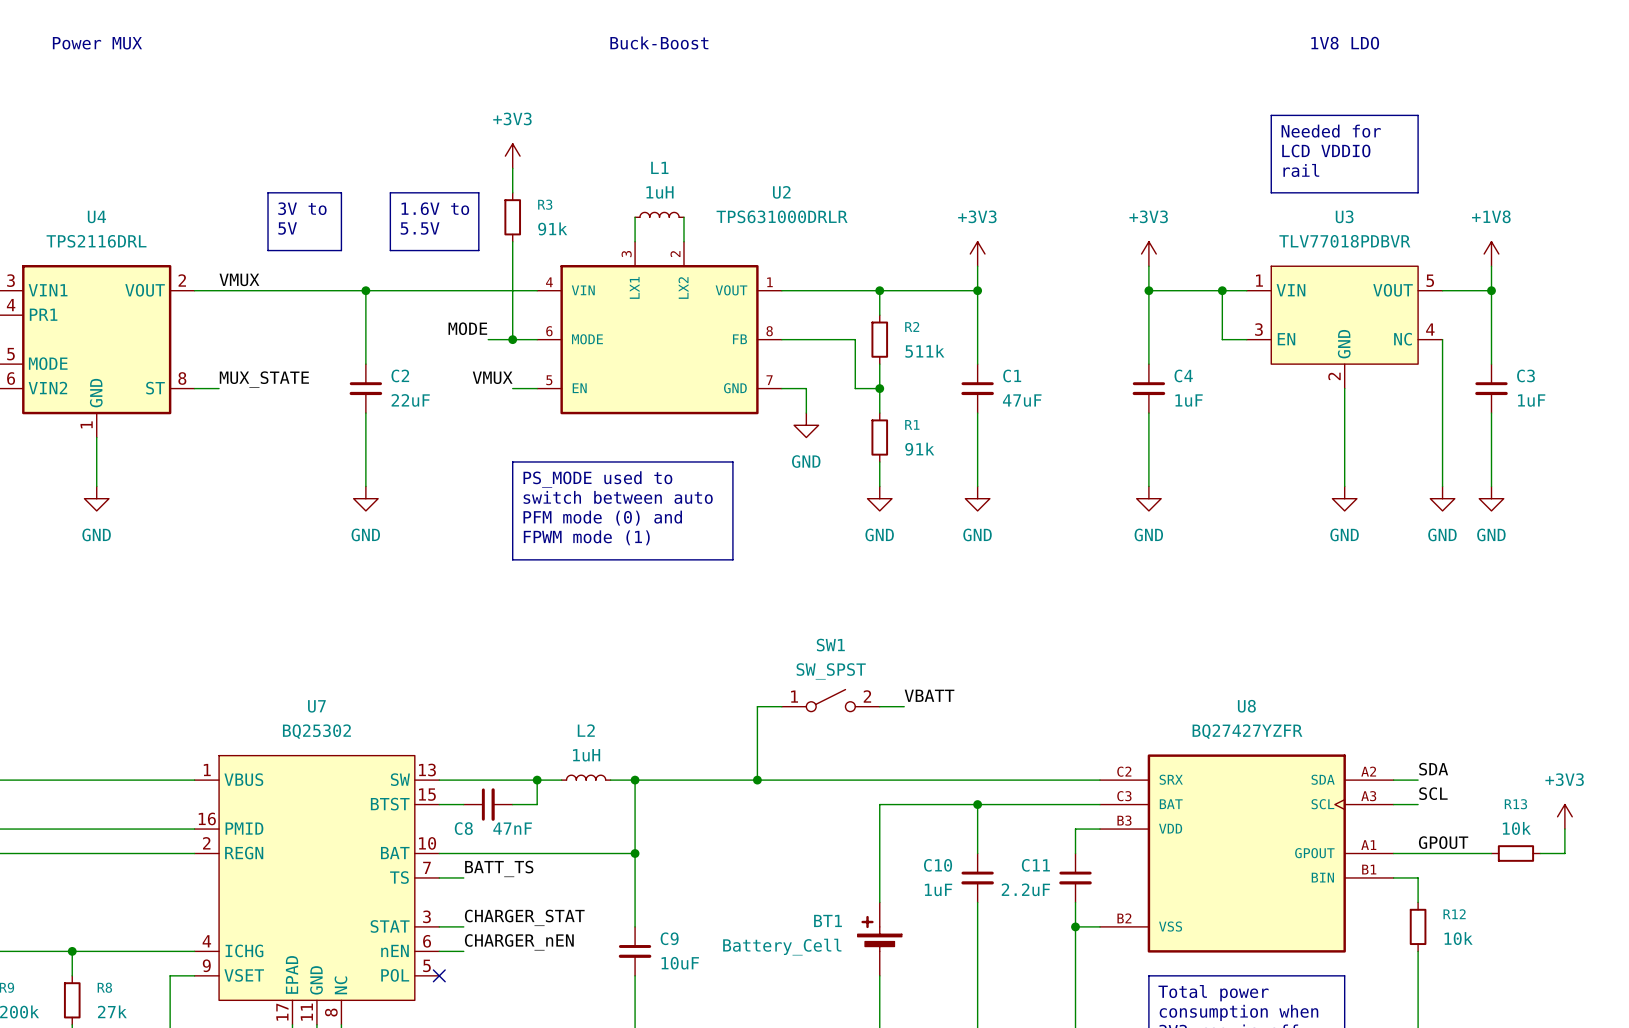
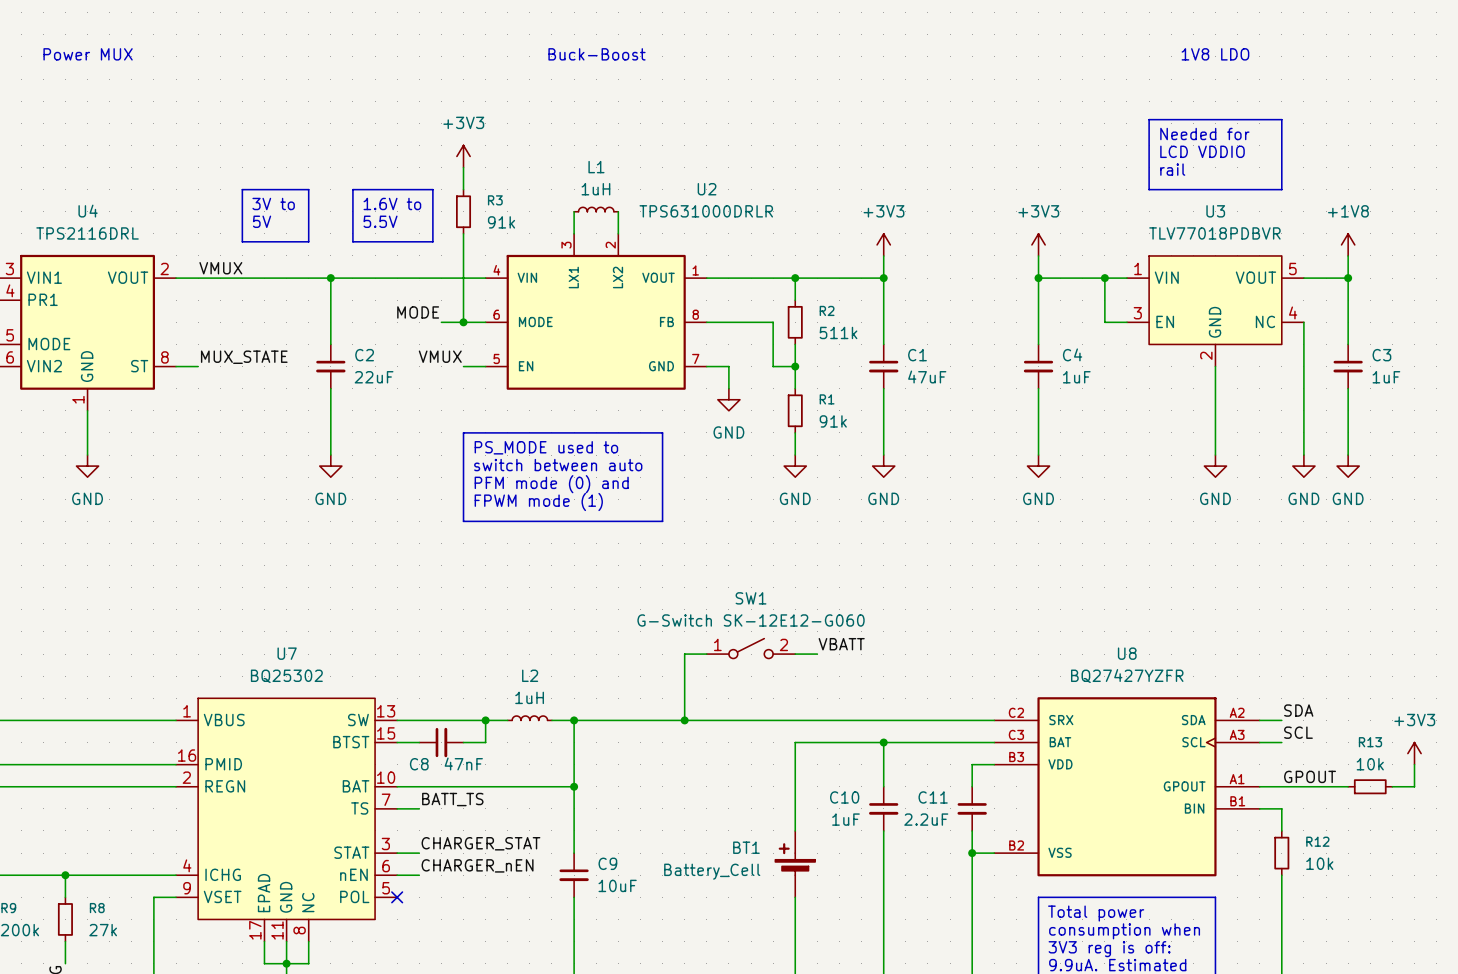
SW1 value: SW_SPST (831, 671) -> G-Switch SK-12E12-G060 (751, 620)

